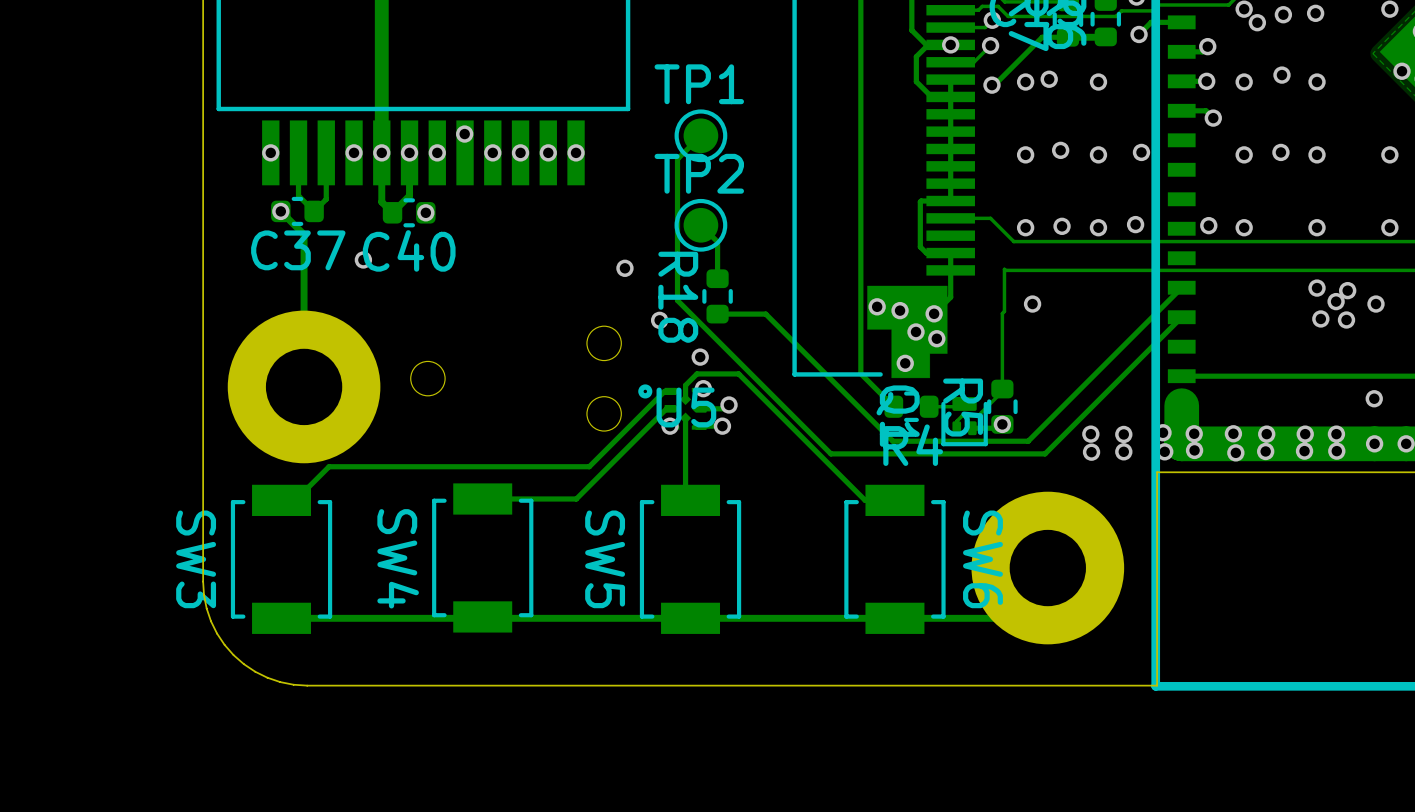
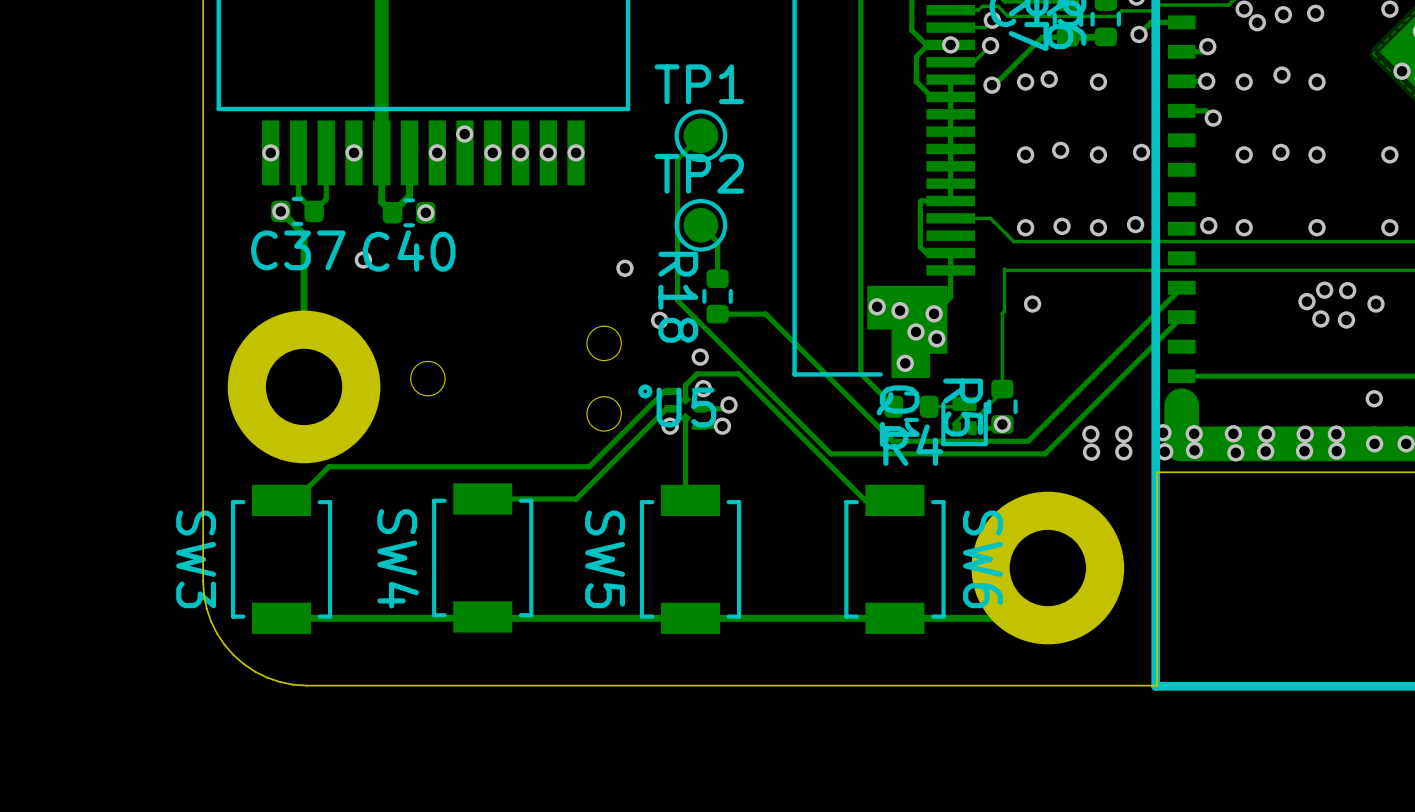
via: (381, 152) -> none
via: (409, 152) -> none
via: (1317, 288) -> none
via: none -> (1324, 290)
via: none -> (1306, 301)
via: (1336, 301) -> none

